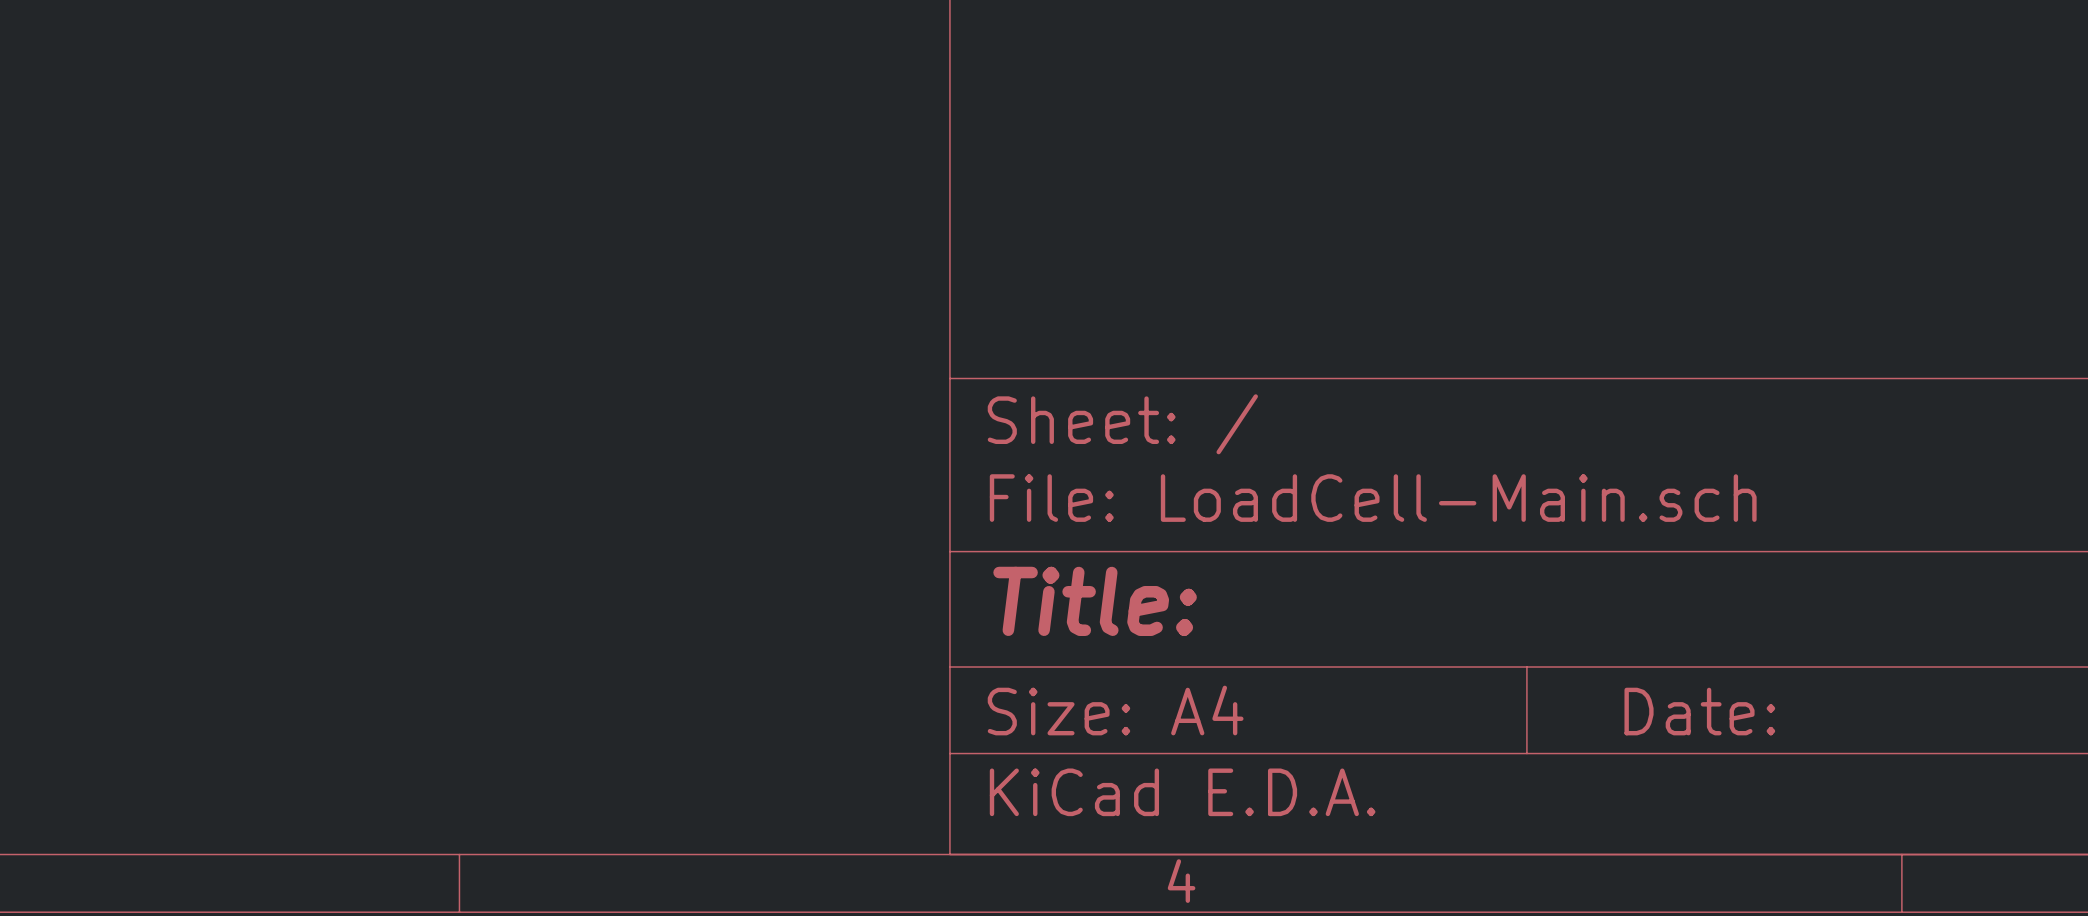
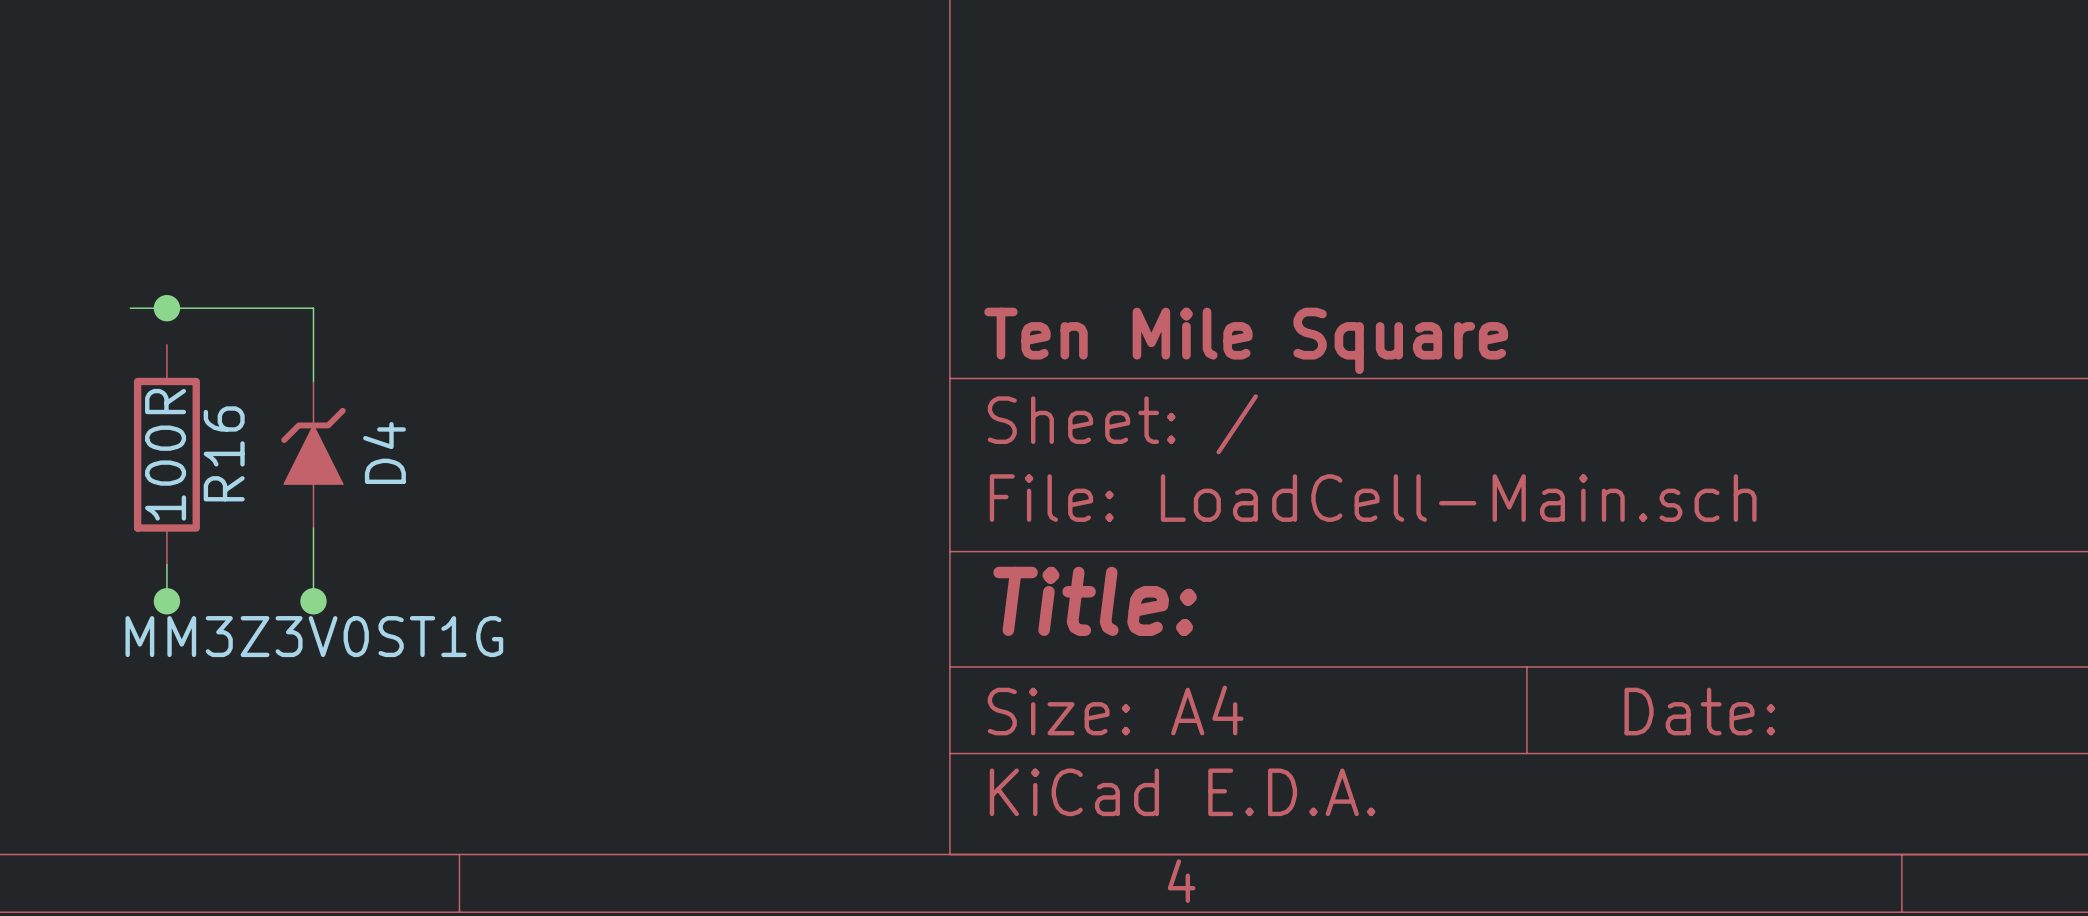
wire: none -> (130, 308) (313, 308) (313, 381)
junction: none -> (166, 308)
title block: none -> Ten Mile Square (1246, 340)
R16: none -> 100R (166, 454)
D4: none -> MM3Z3V0ST1G (313, 454)
wire: none -> (313, 528) (313, 601)
wire: none -> (166, 564) (166, 601)
junction: none -> (166, 601)
junction: none -> (313, 601)

